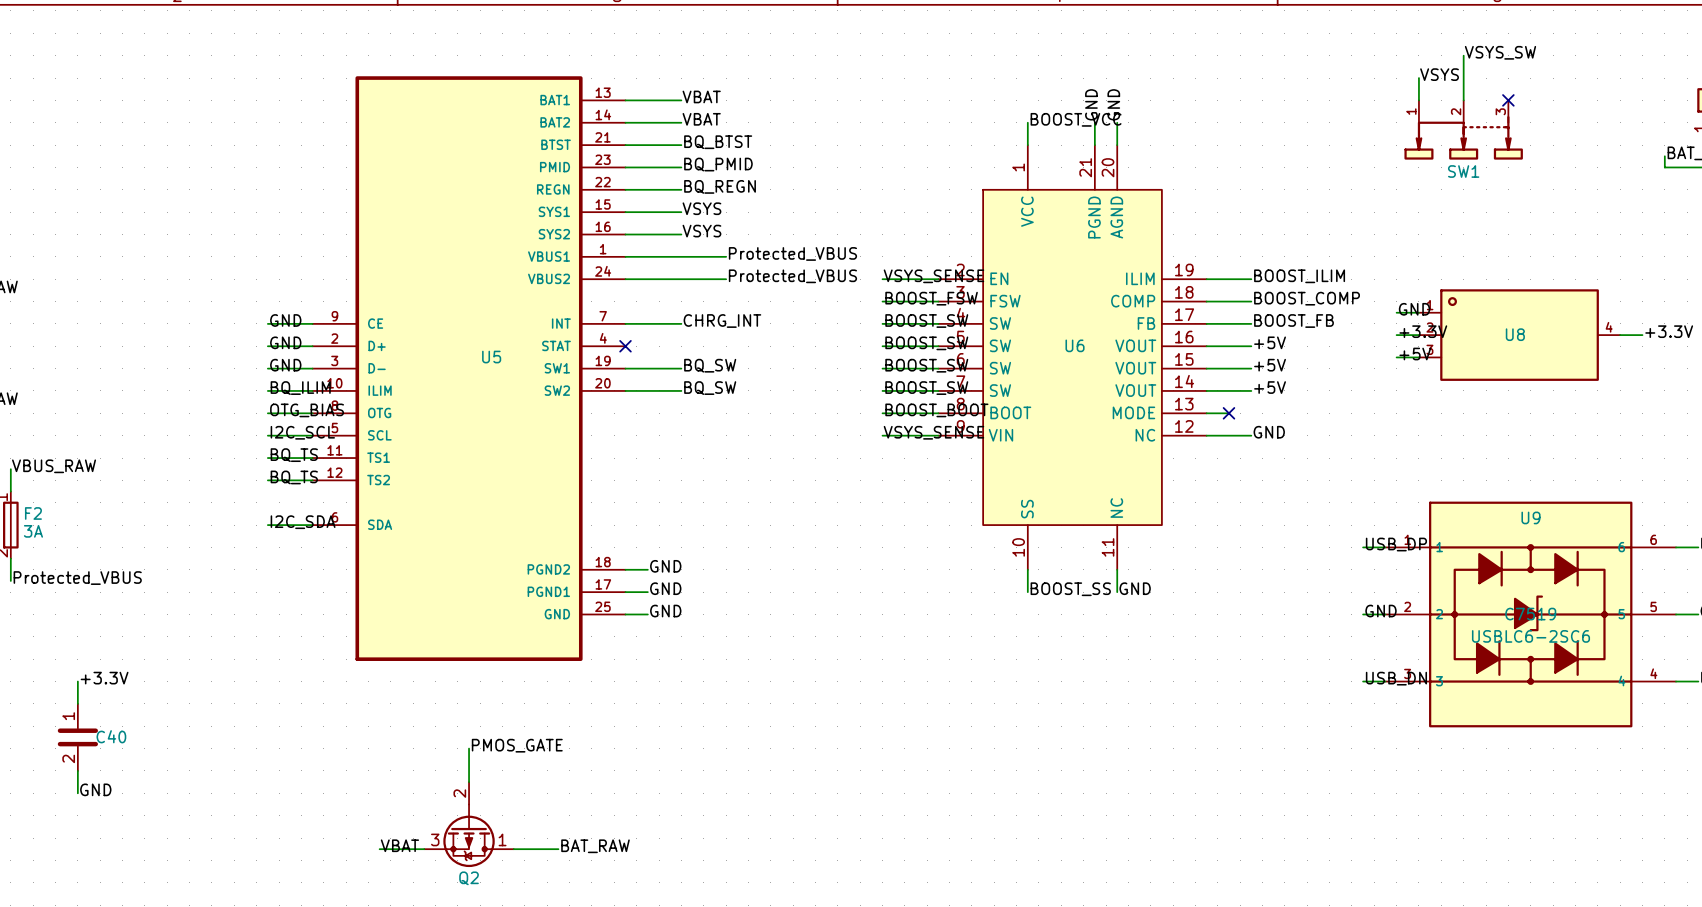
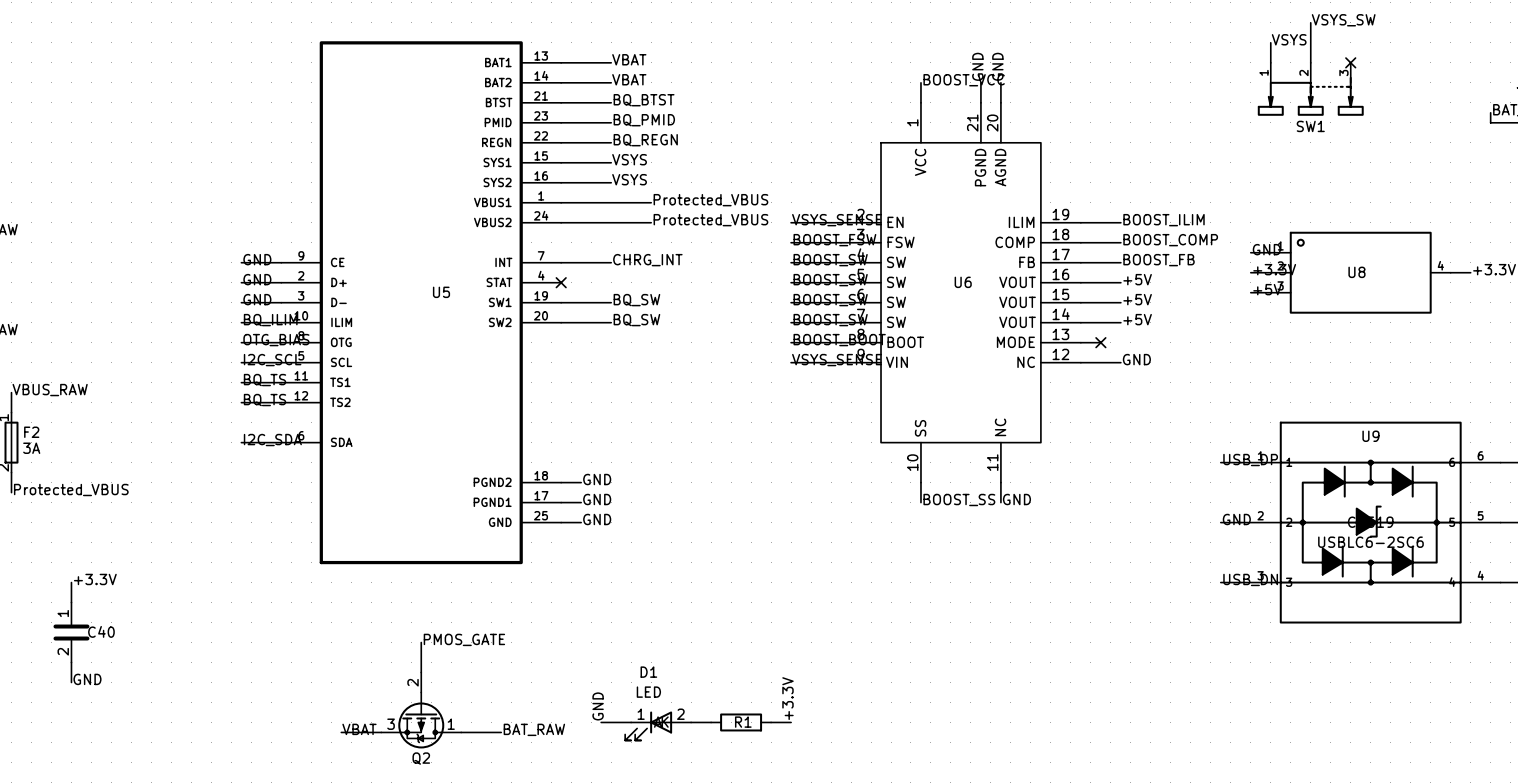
label: none -> +3.3V (787, 698)
label: none -> GND (598, 706)
wire: none -> (601, 722) (631, 722)
wire: none -> (691, 722) (711, 722)
R1: none -> (741, 722)
wire: none -> (771, 722) (791, 722)
D1: none -> LED (658, 725)

